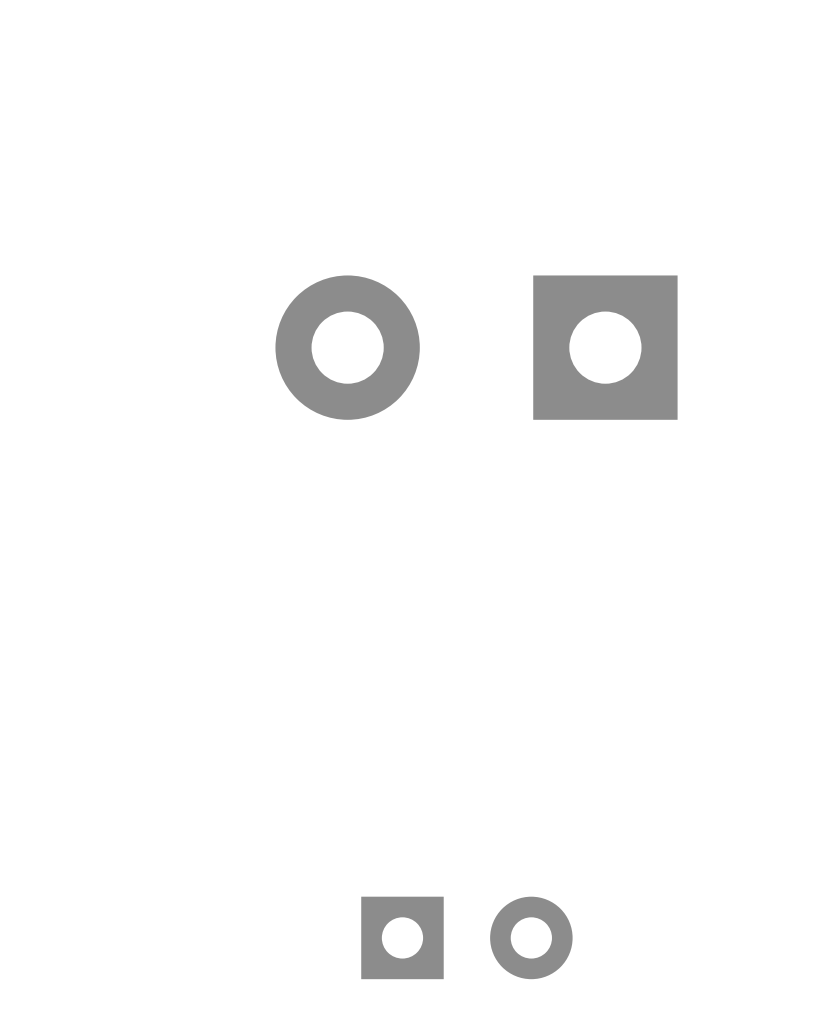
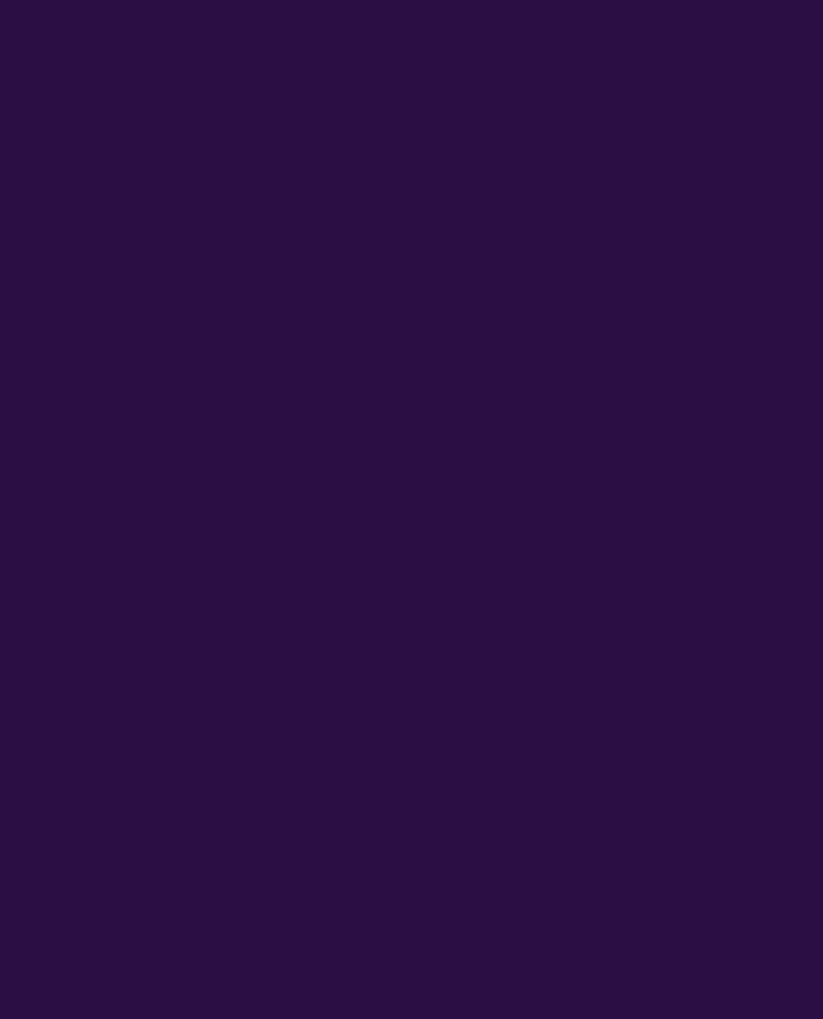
part: (476, 347) -> none
part: (466, 937) -> none

